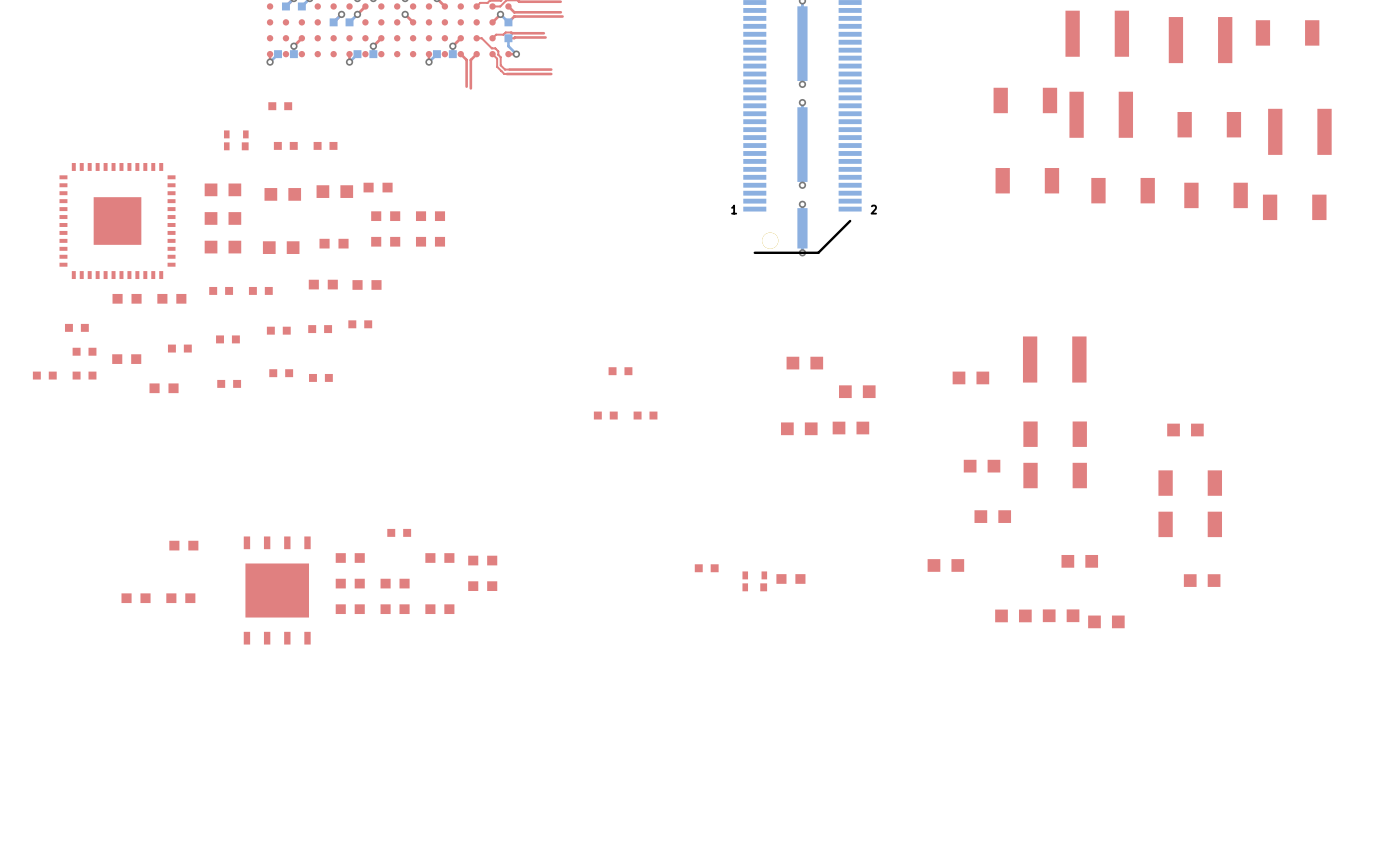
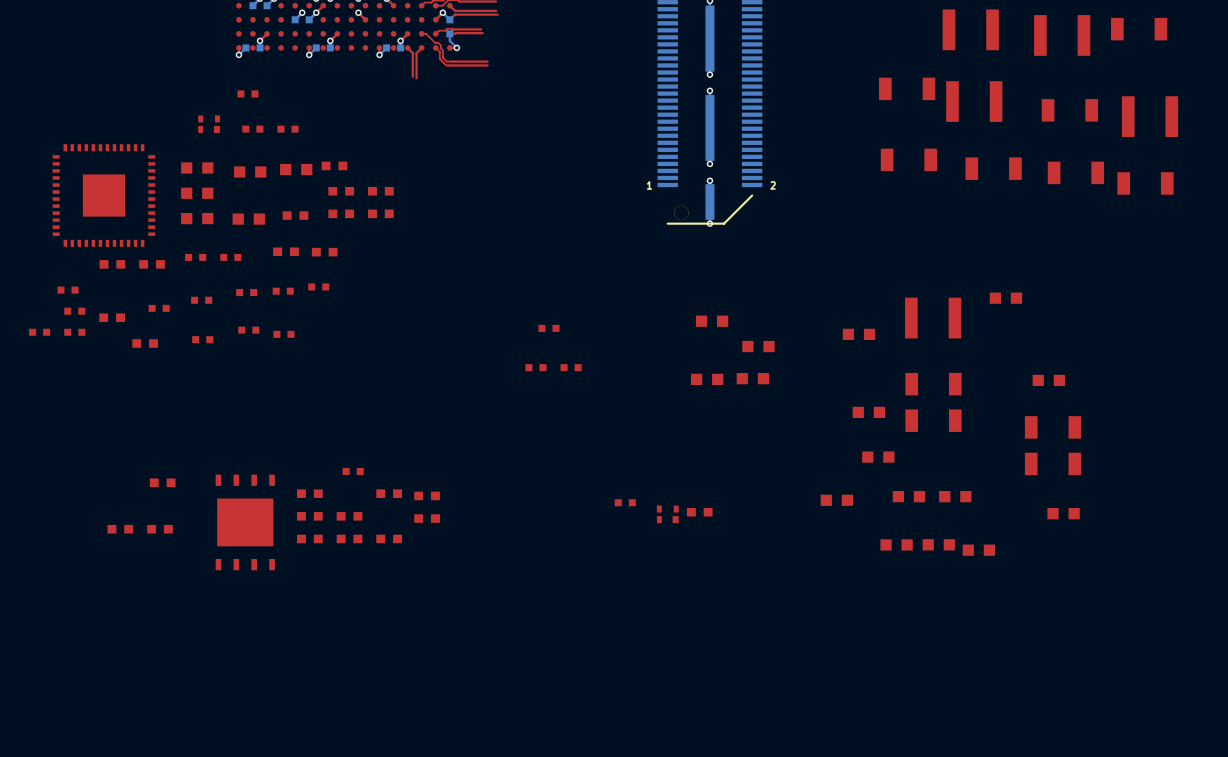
part: none -> (1005, 298)
part: none -> (908, 496)

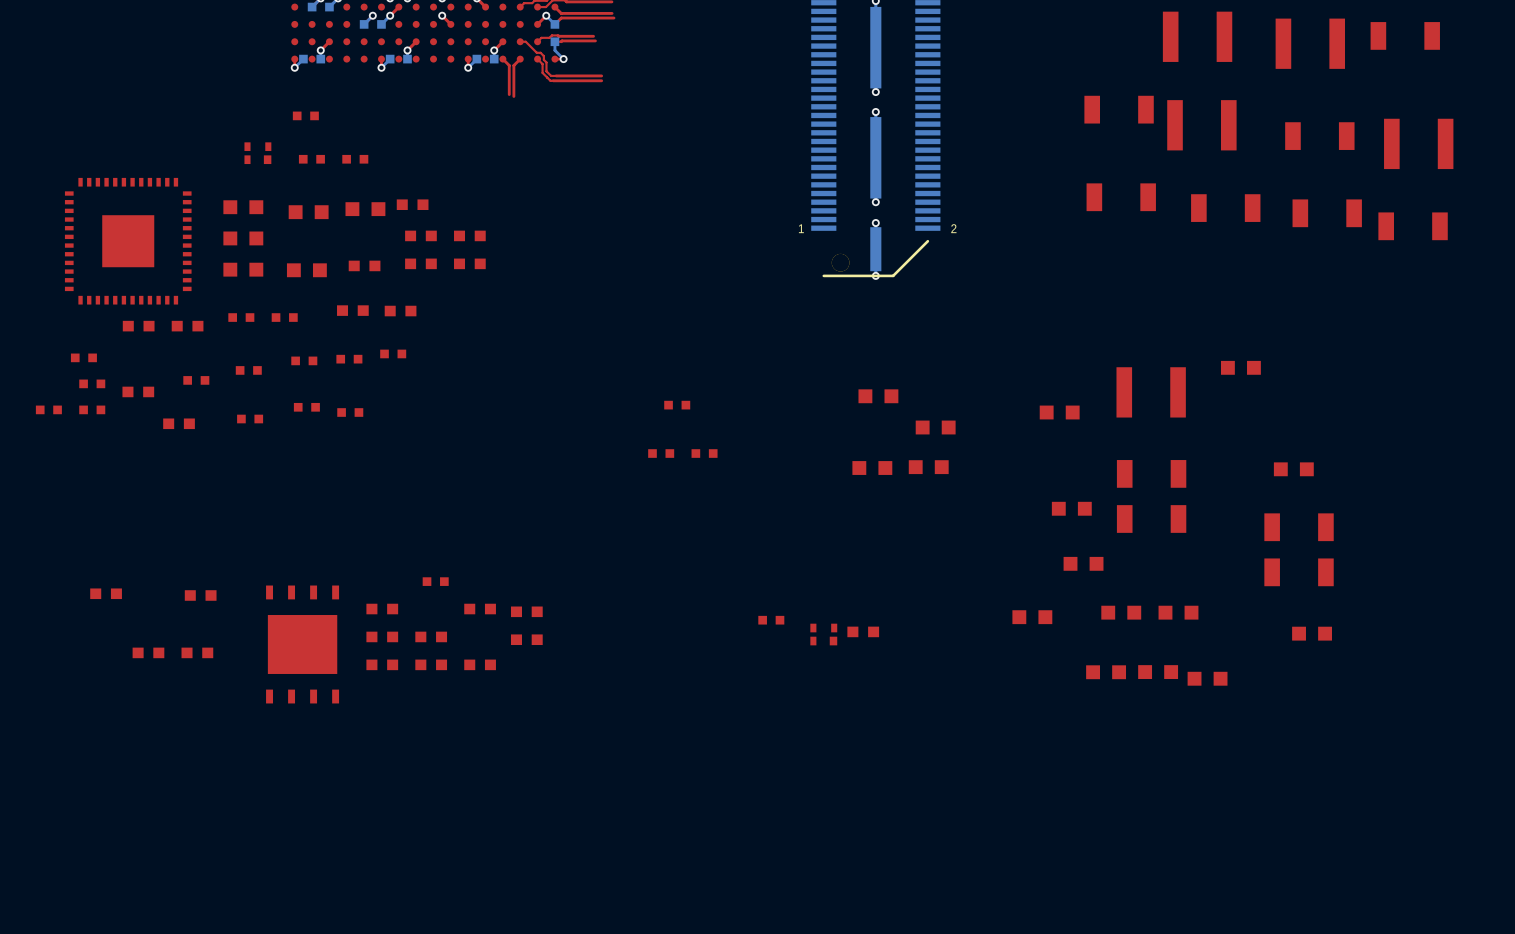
part: none -> (106, 593)

